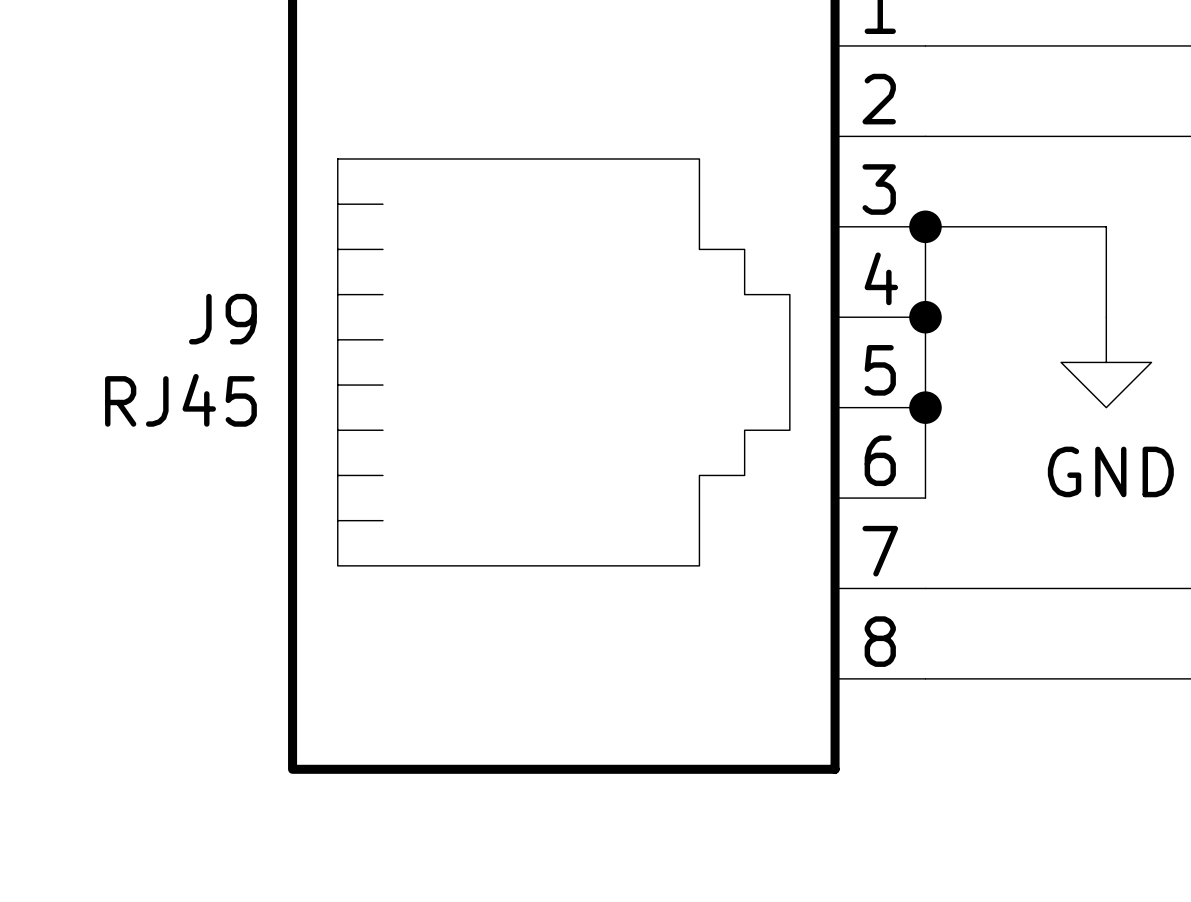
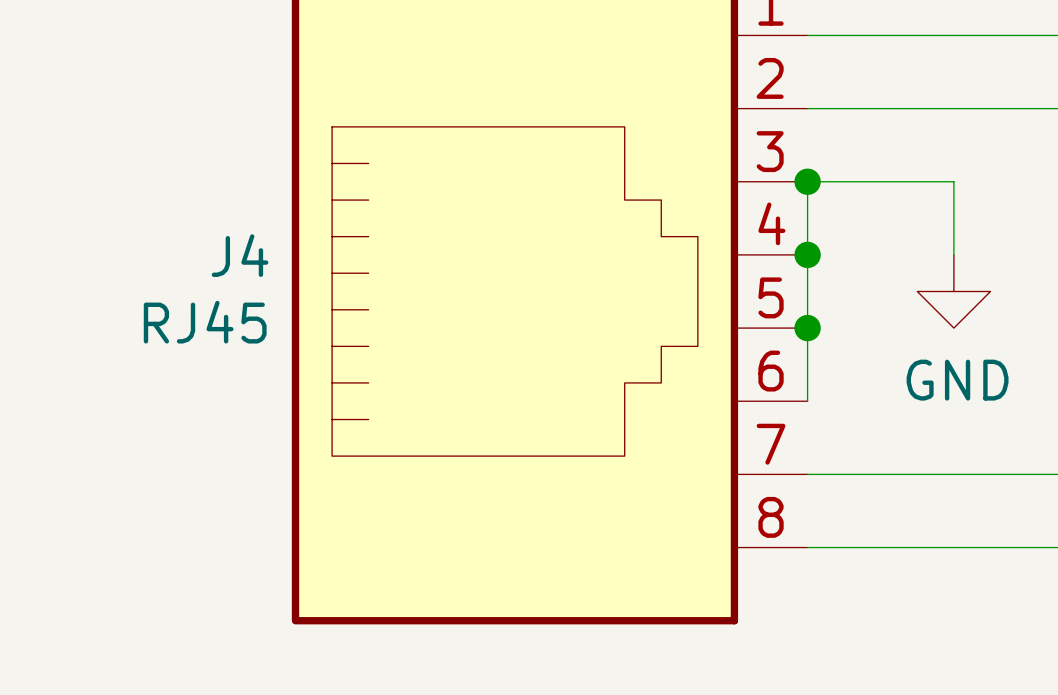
J9 name: J9 (222, 319) -> J4 (240, 255)

